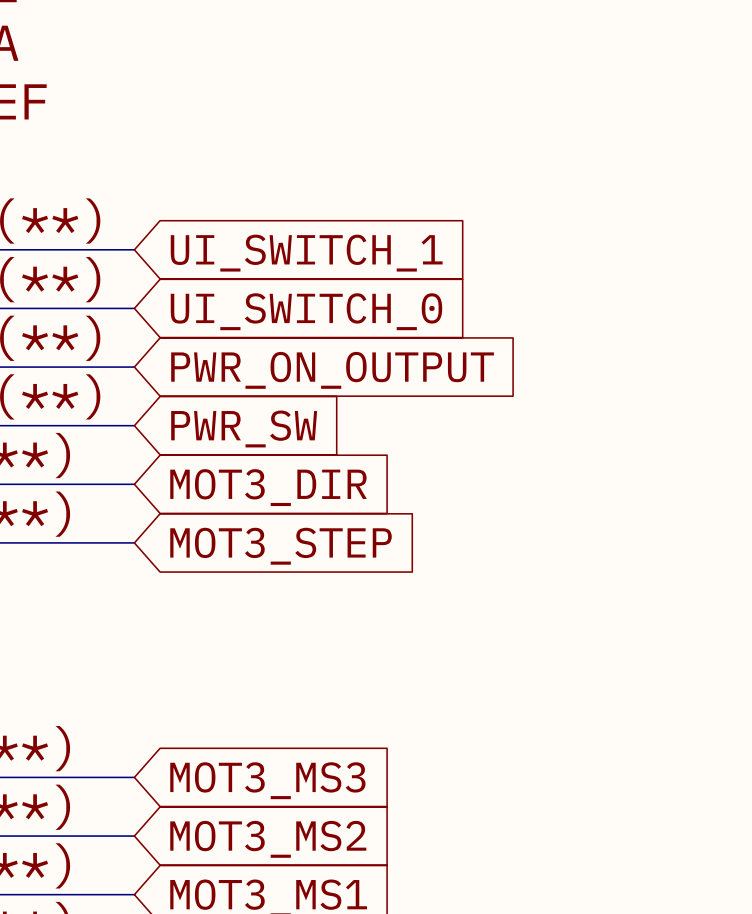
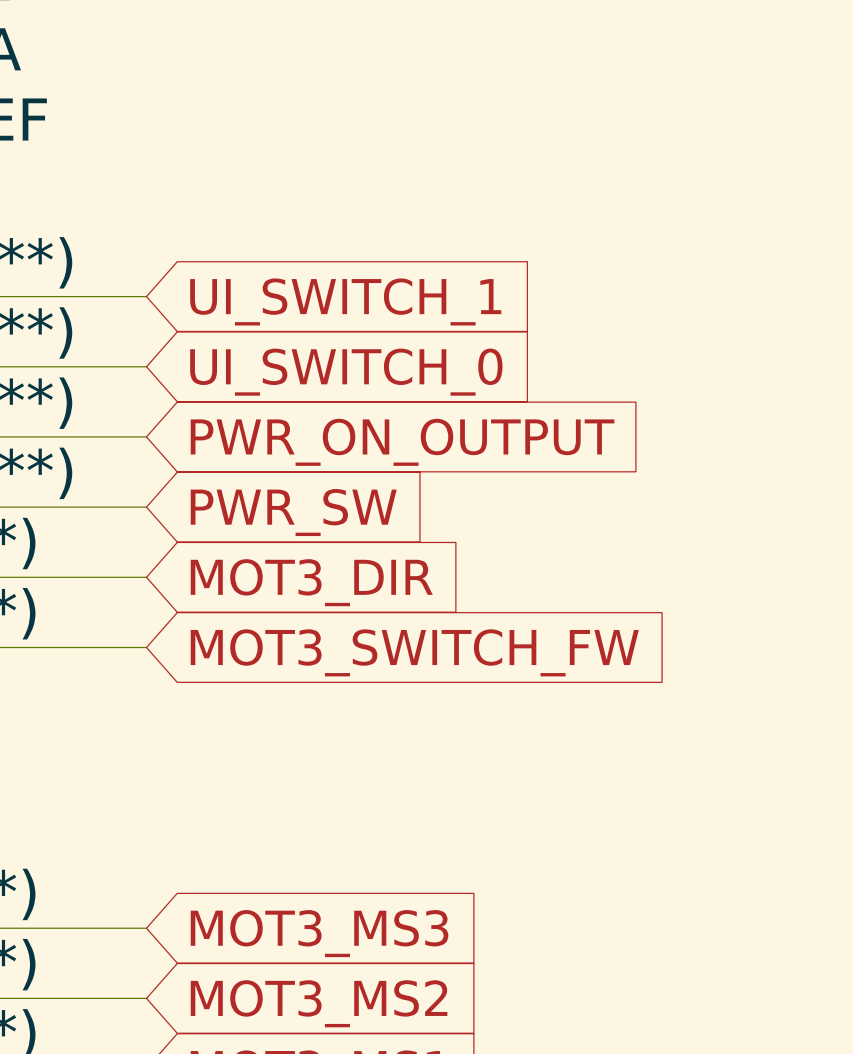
global label: MOT3_STEP (281, 546) -> MOT3_SWITCH_FW (414, 652)

